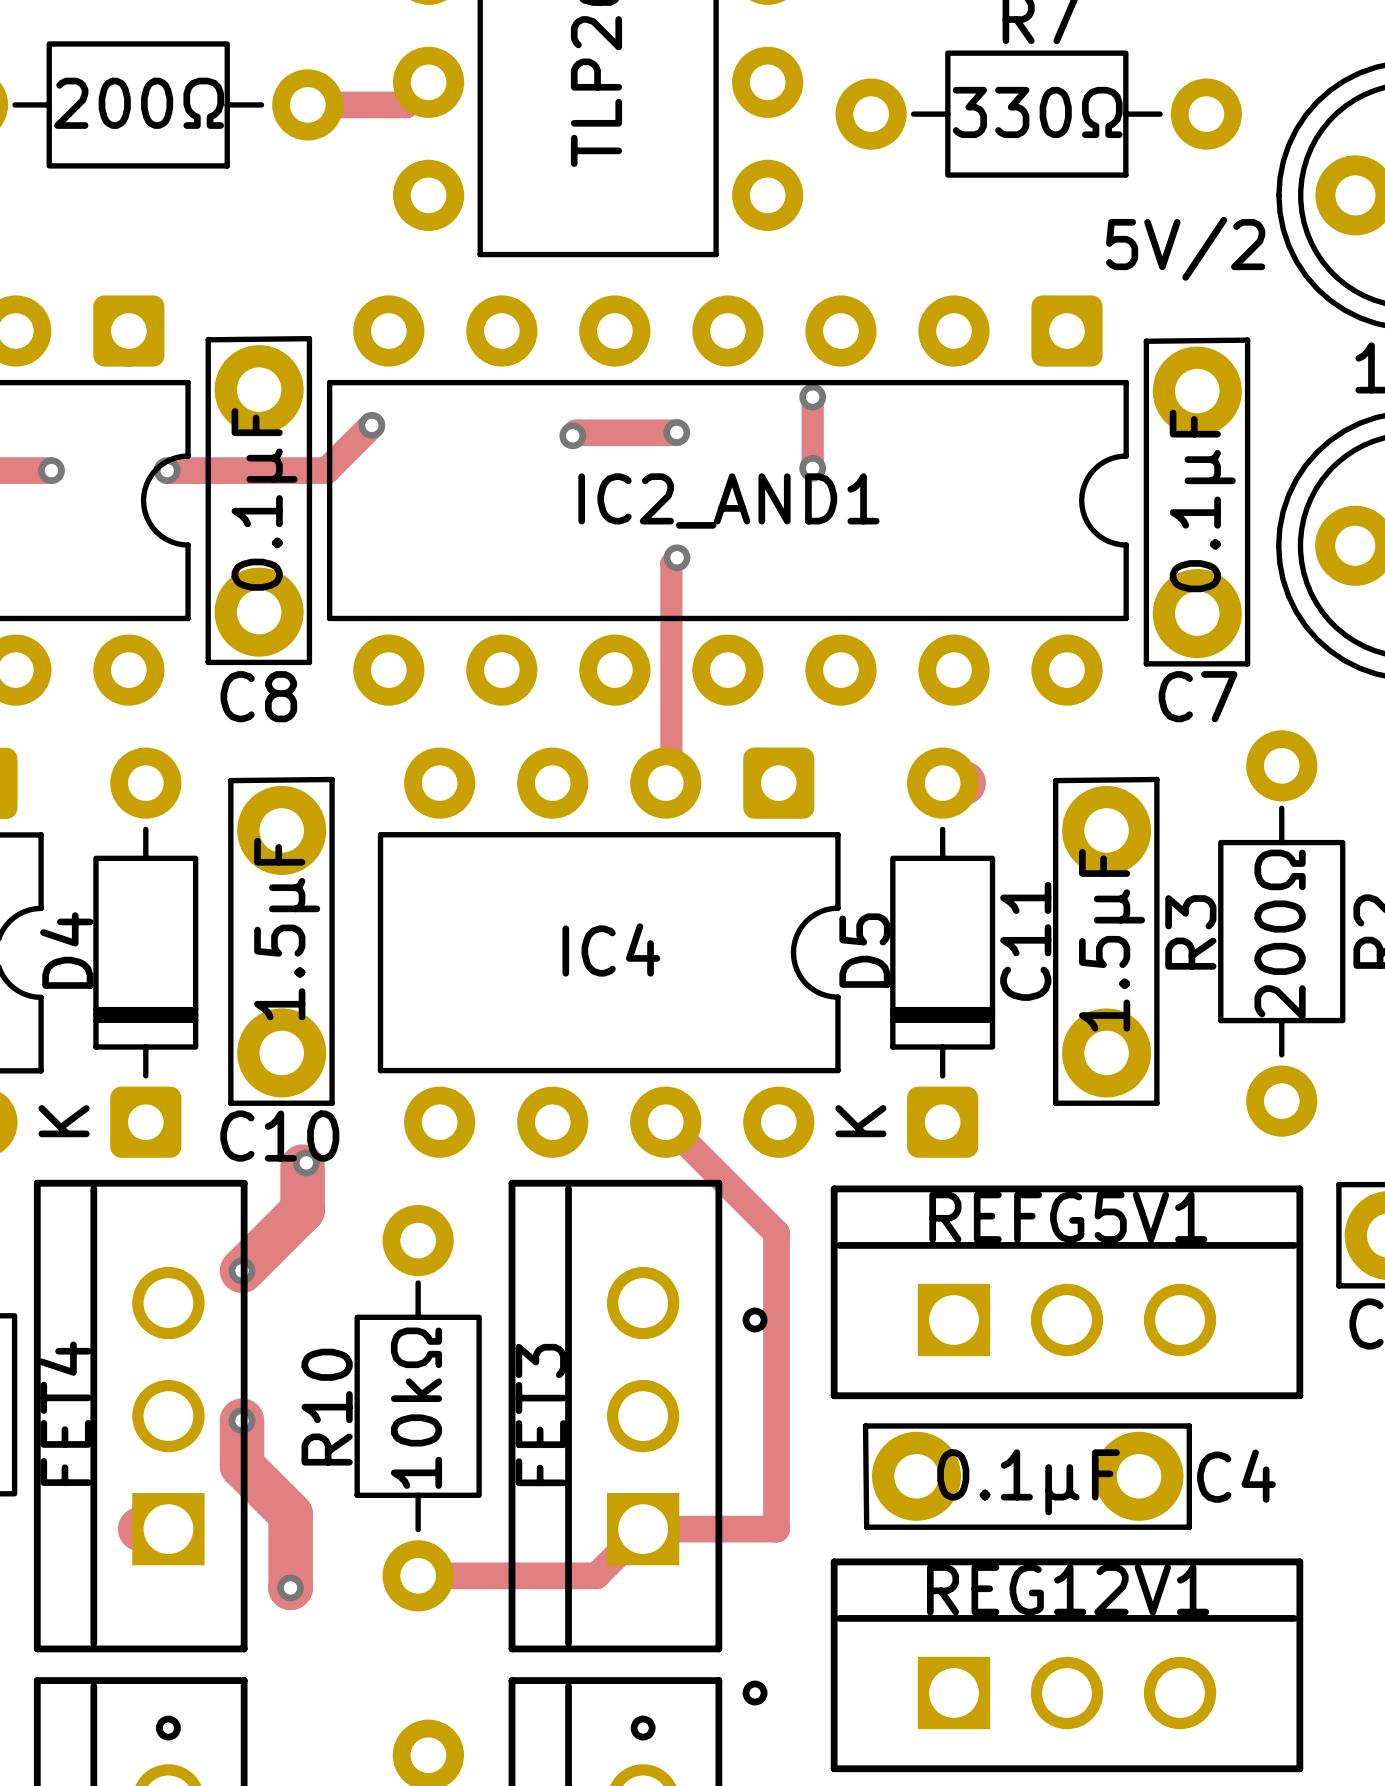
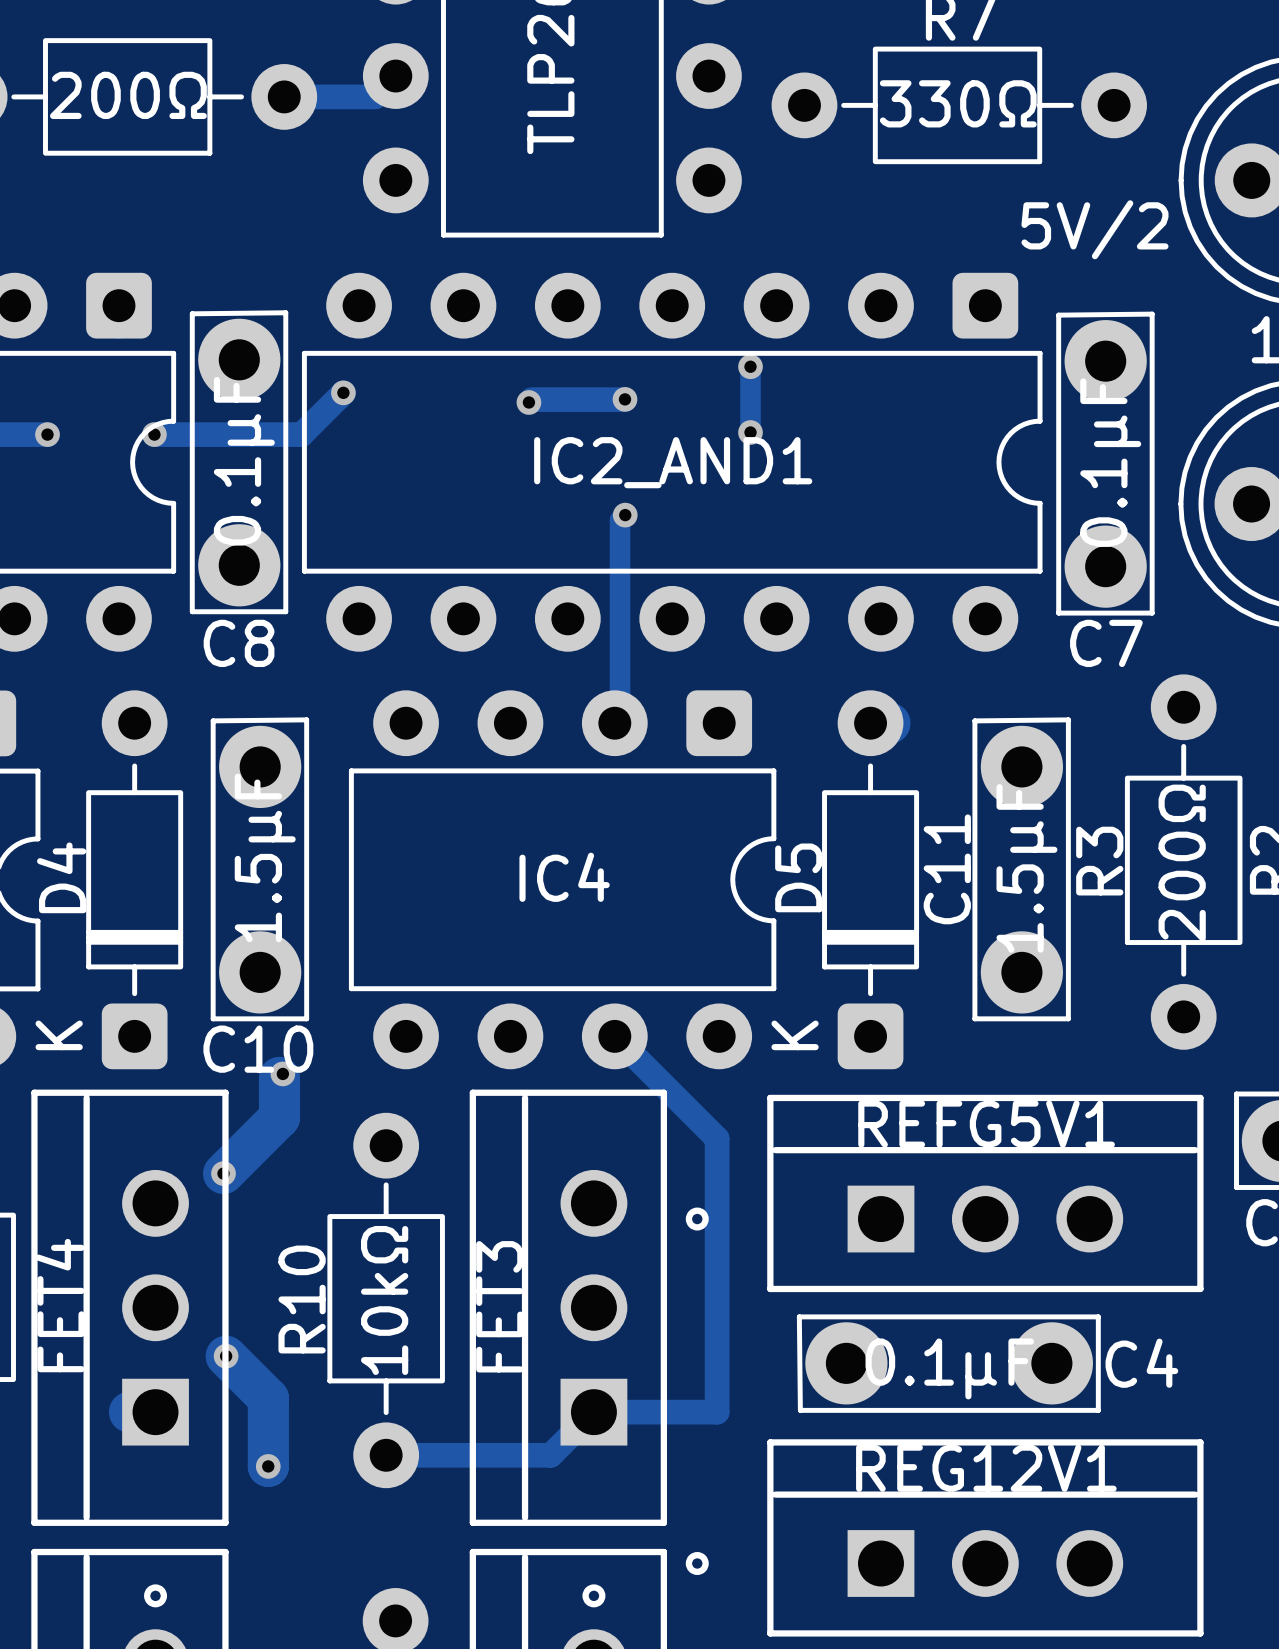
track: (242, 1420) (242, 1465) (244, 1468) -> none
via position: (242, 1420) -> (226, 1356)

